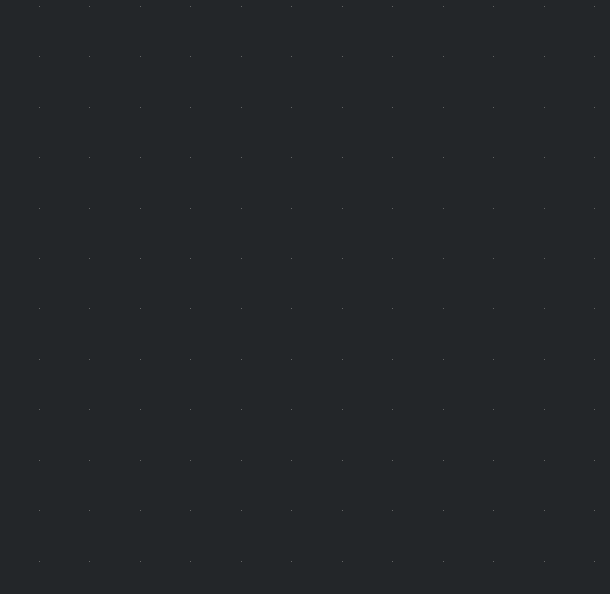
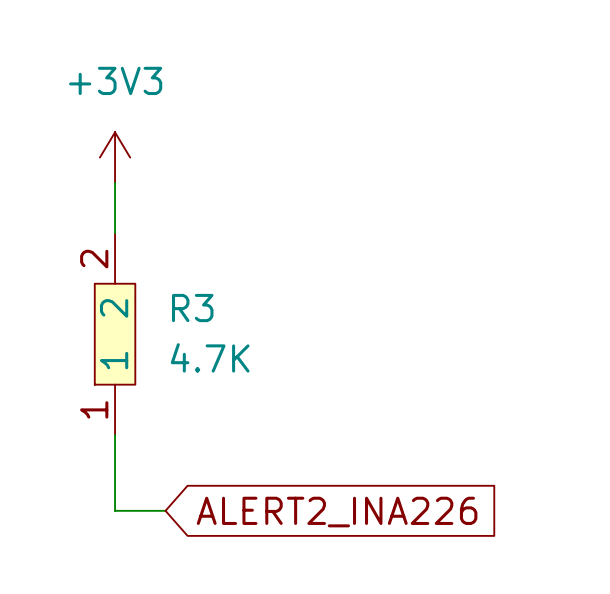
power symbol: none -> +3V3 (115, 157)
wire: none -> (115, 182) (115, 233)
R3: none -> 4.7K (115, 334)
wire: none -> (115, 435) (115, 510) (165, 510)
global label: none -> ALERT2_INA226 (337, 512)

